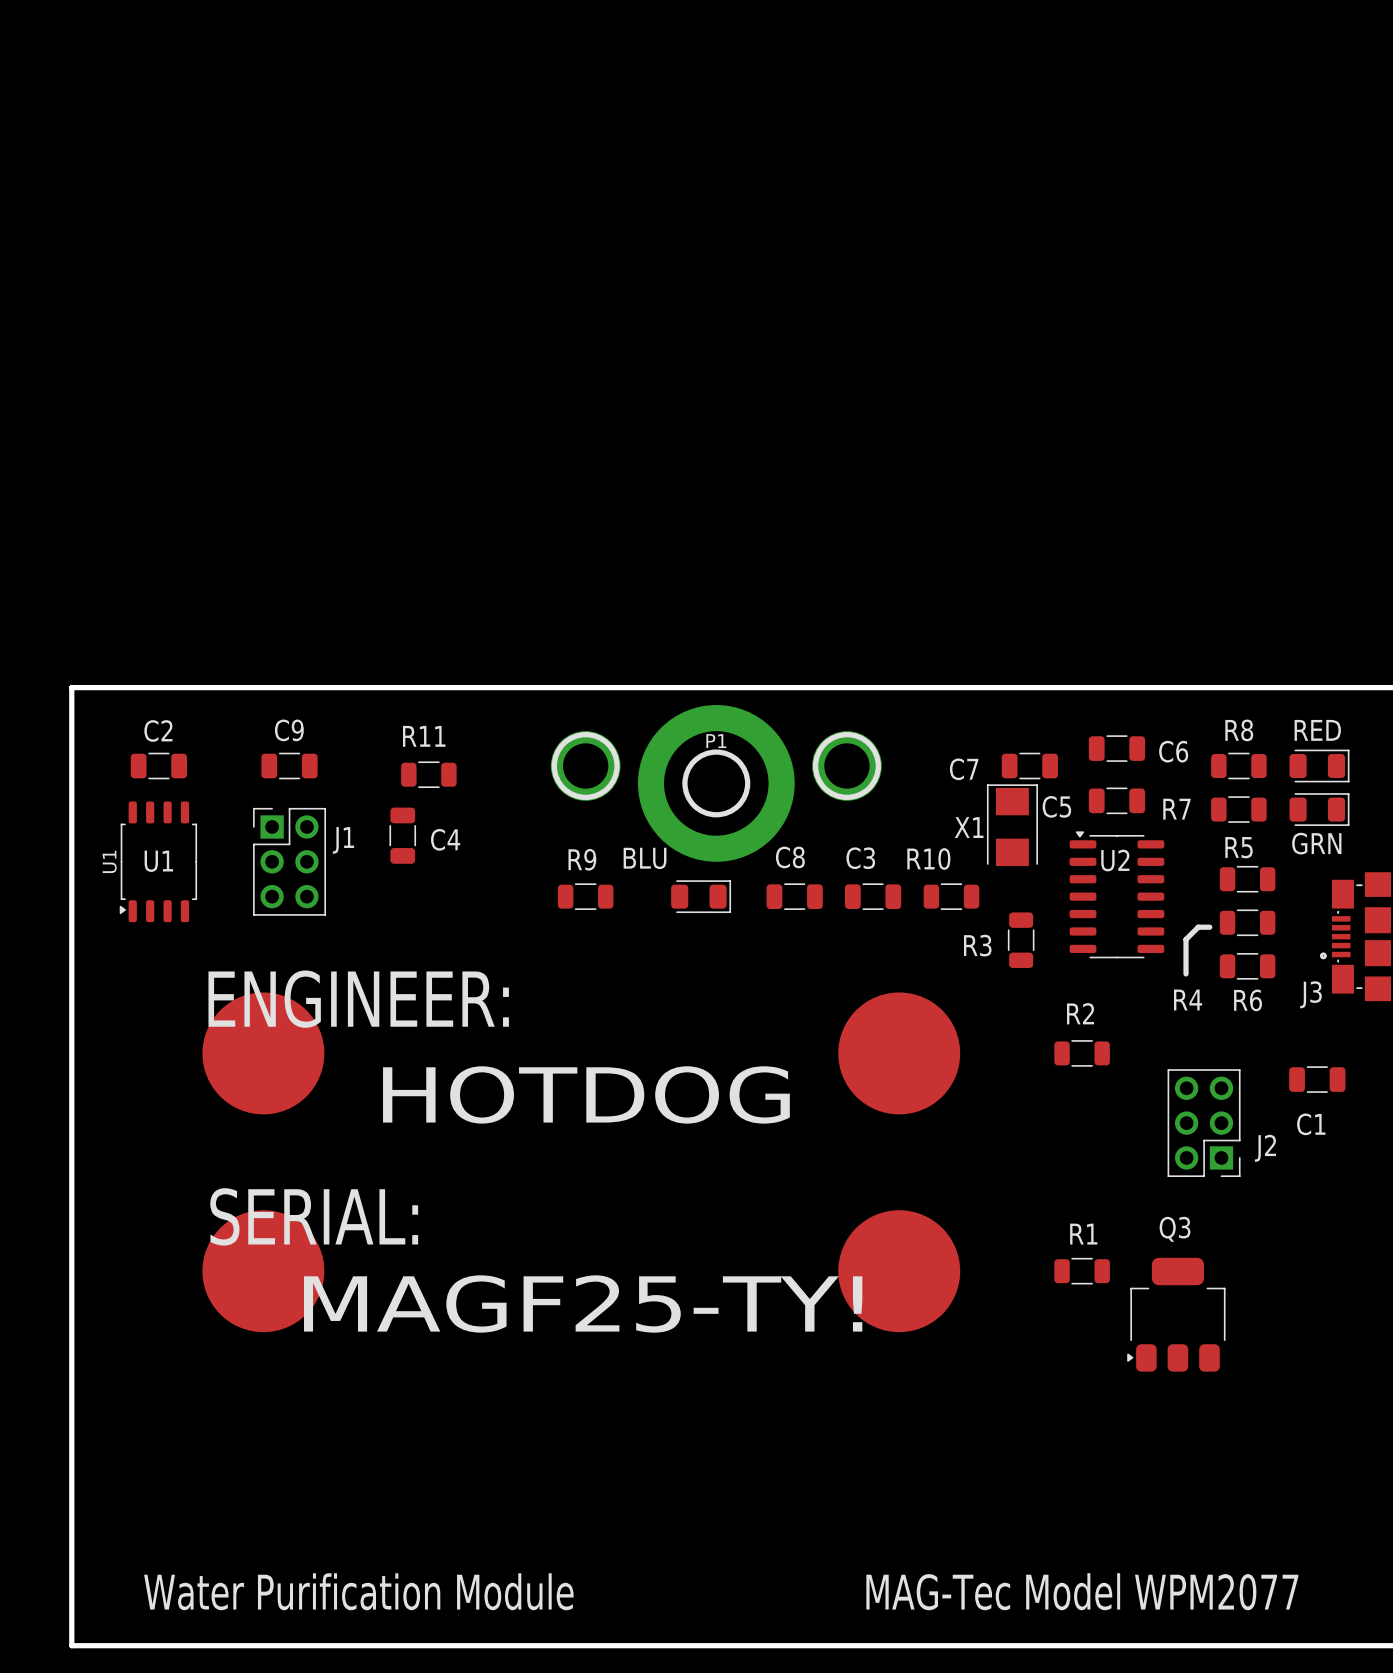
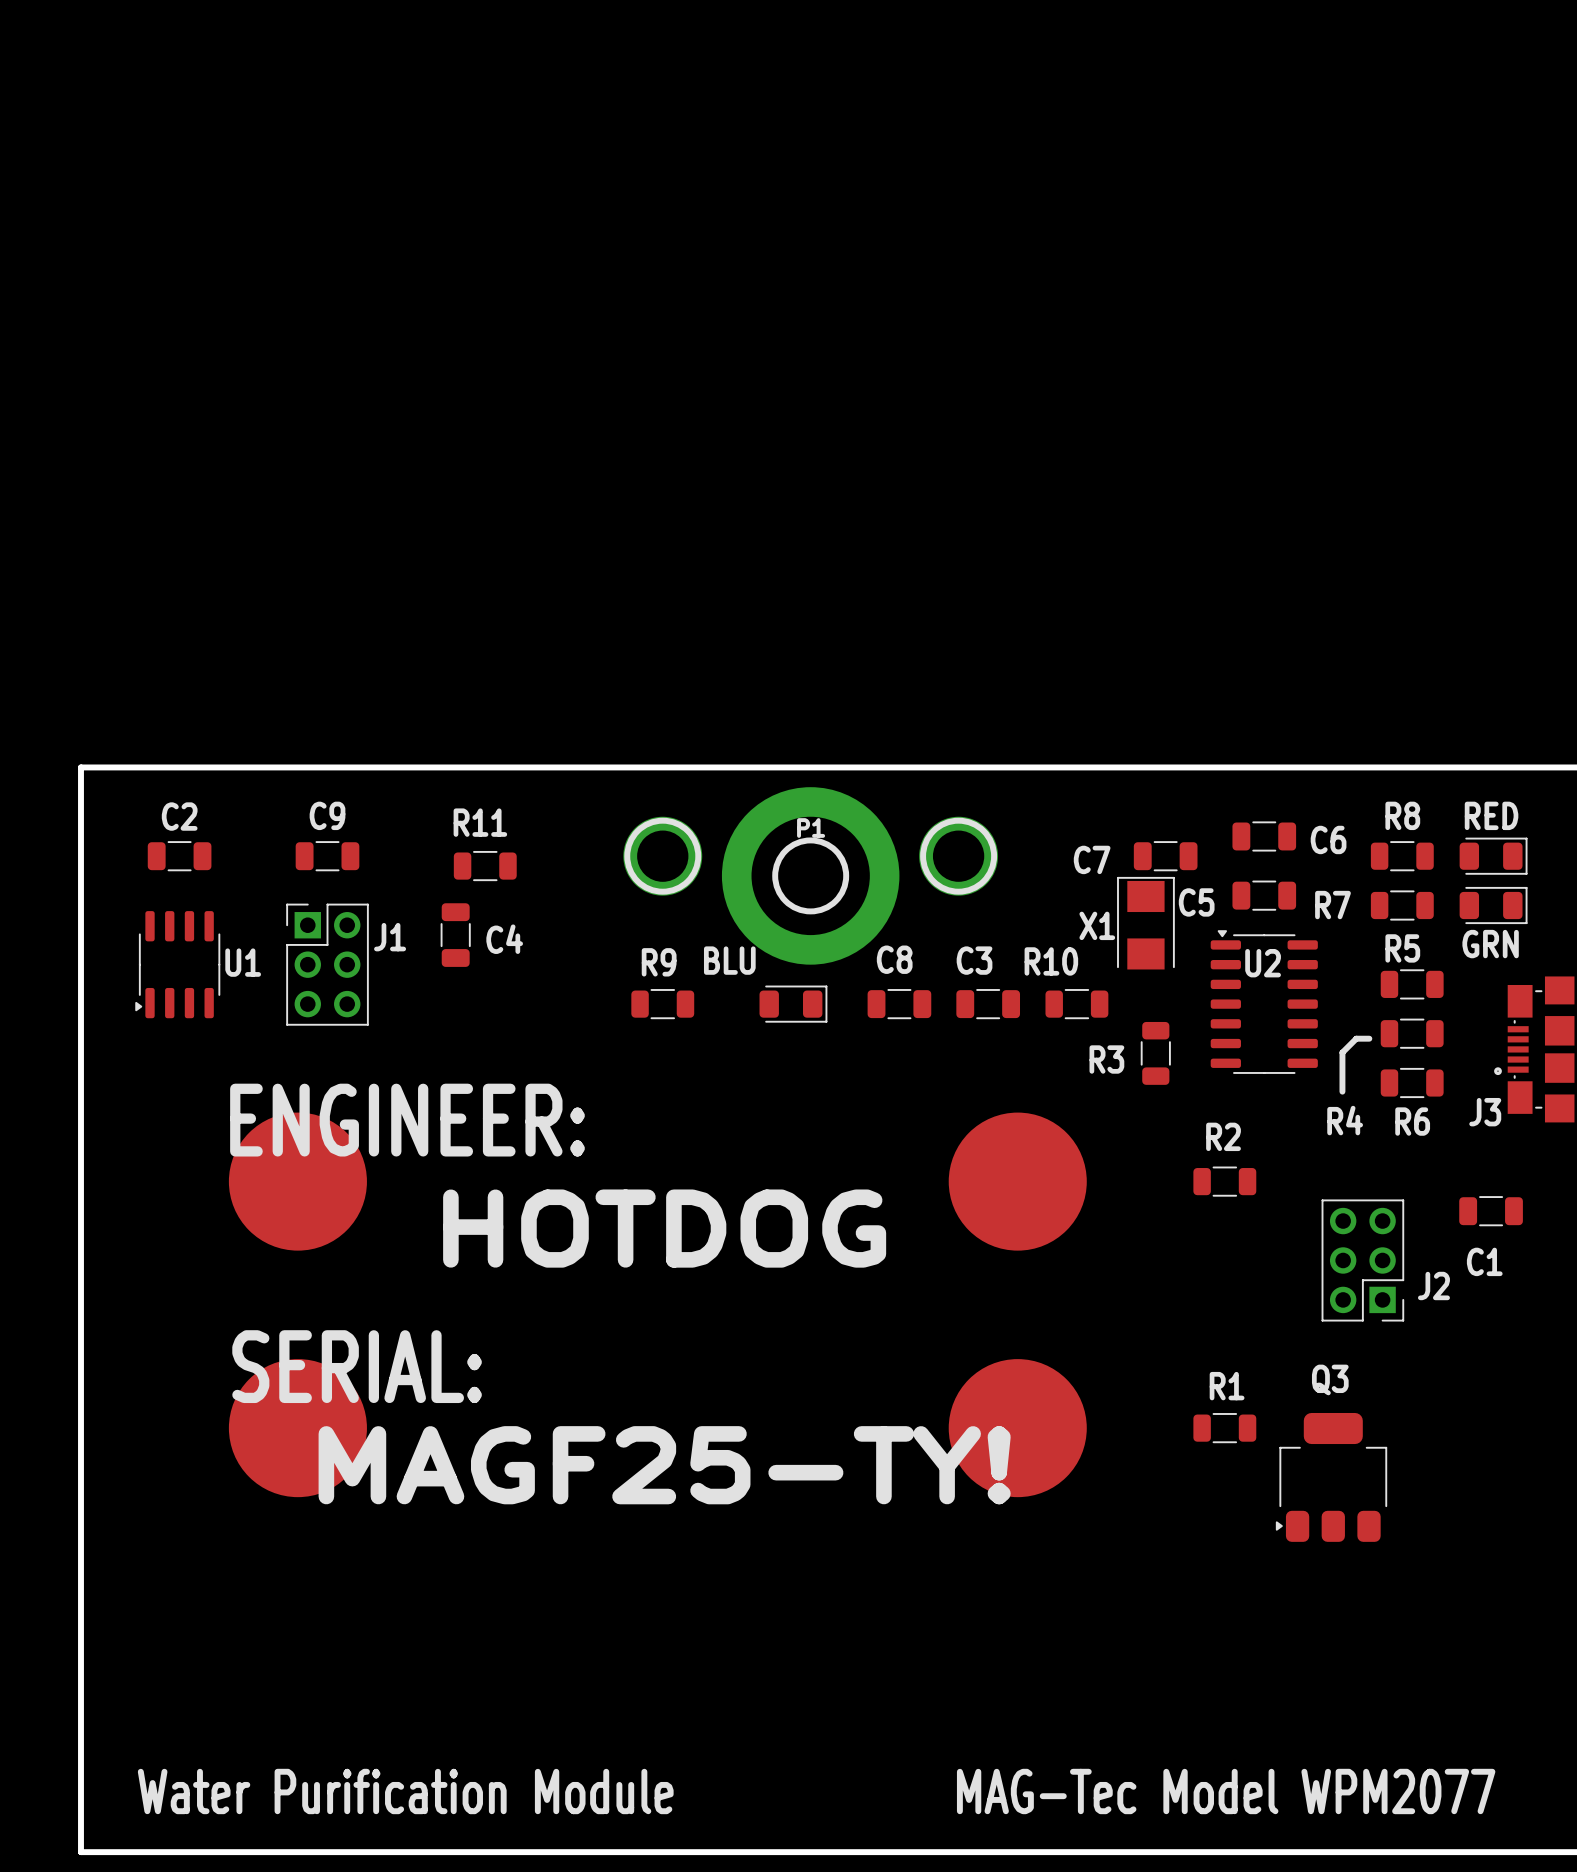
part: none -> (177, 964)
U1: (158, 861) -> none
text position: U1 (158, 861) -> U1 (243, 962)

